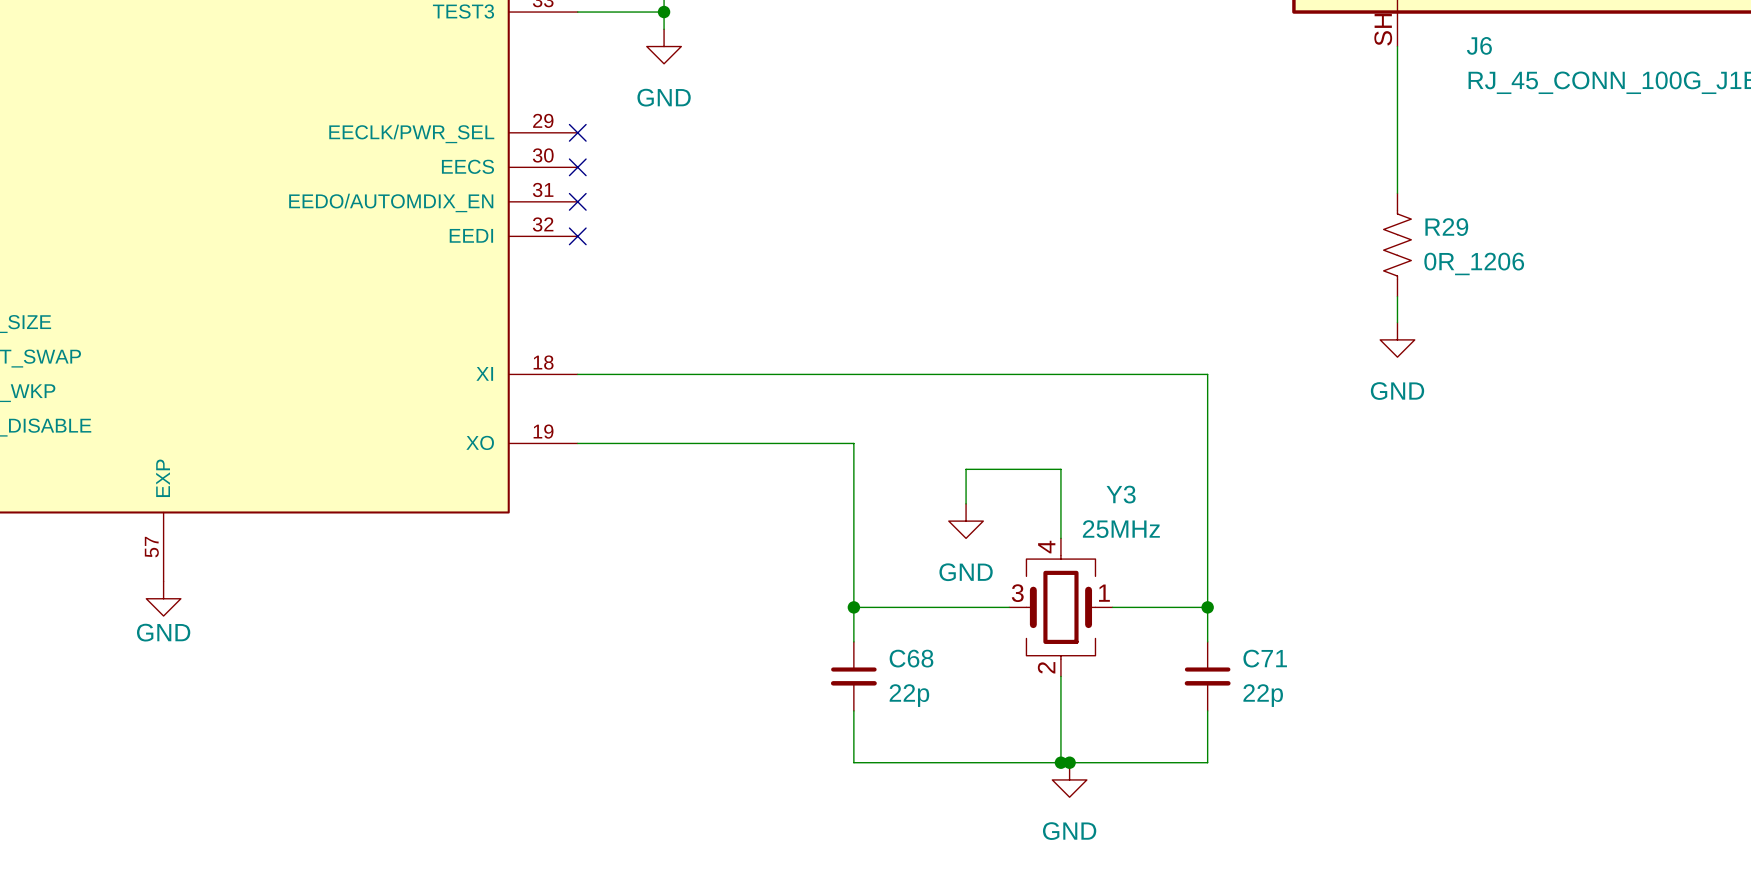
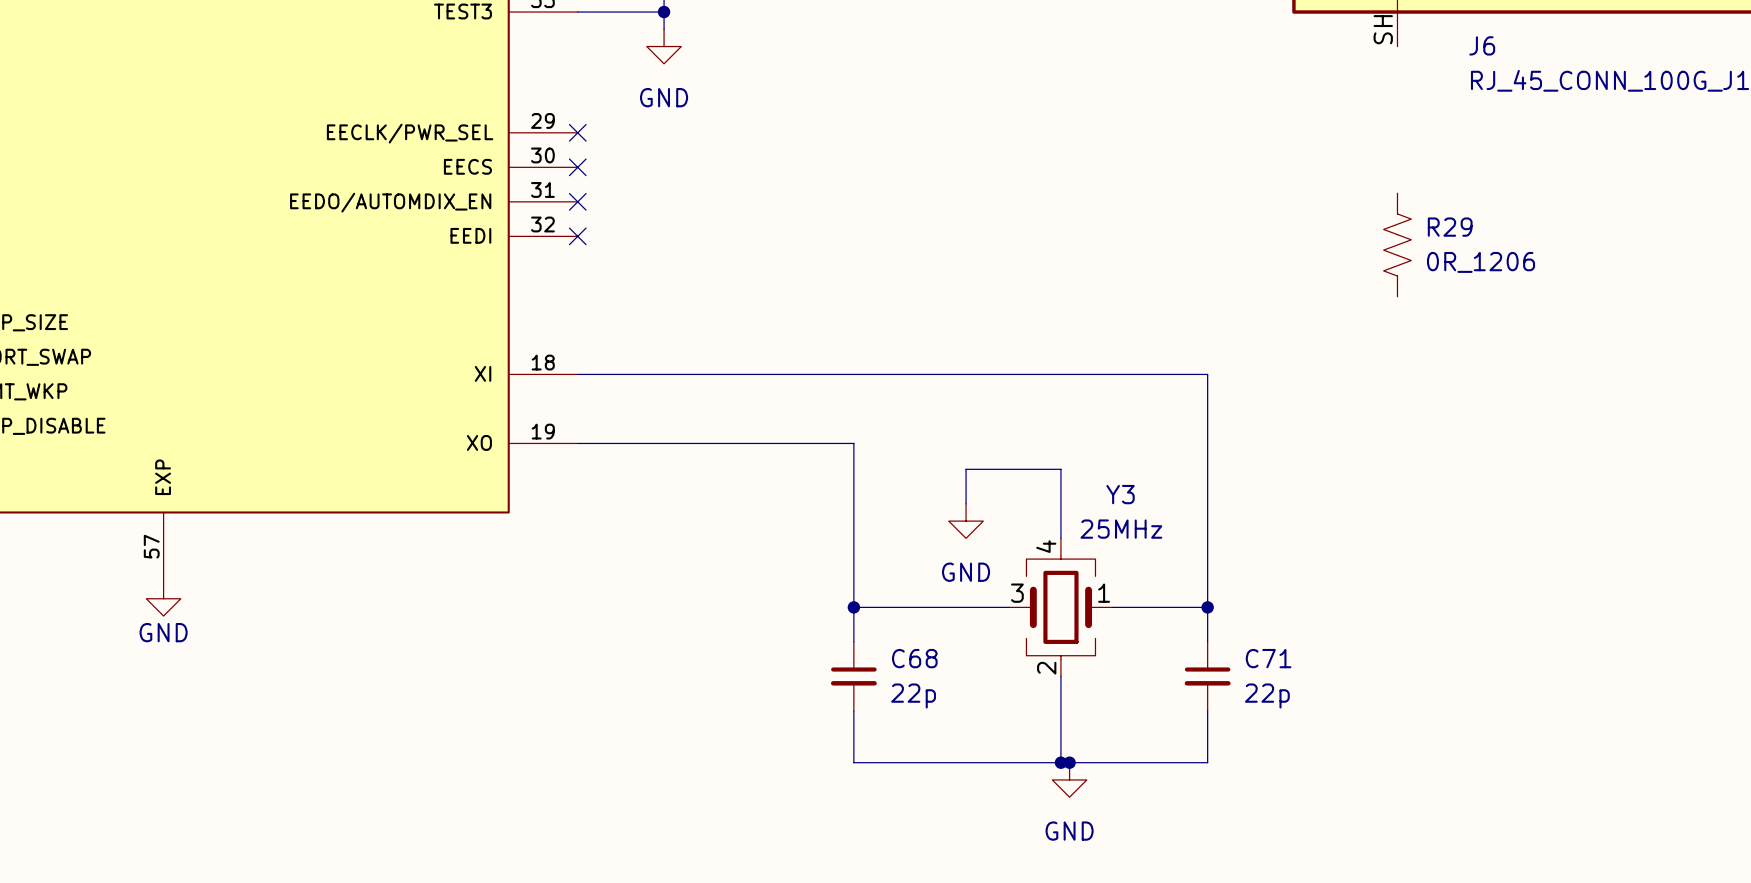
wire: (1397, 46) (1397, 193) -> none
wire: (1397, 296) (1397, 322) -> none
power symbol: GND (1397, 339) -> none

